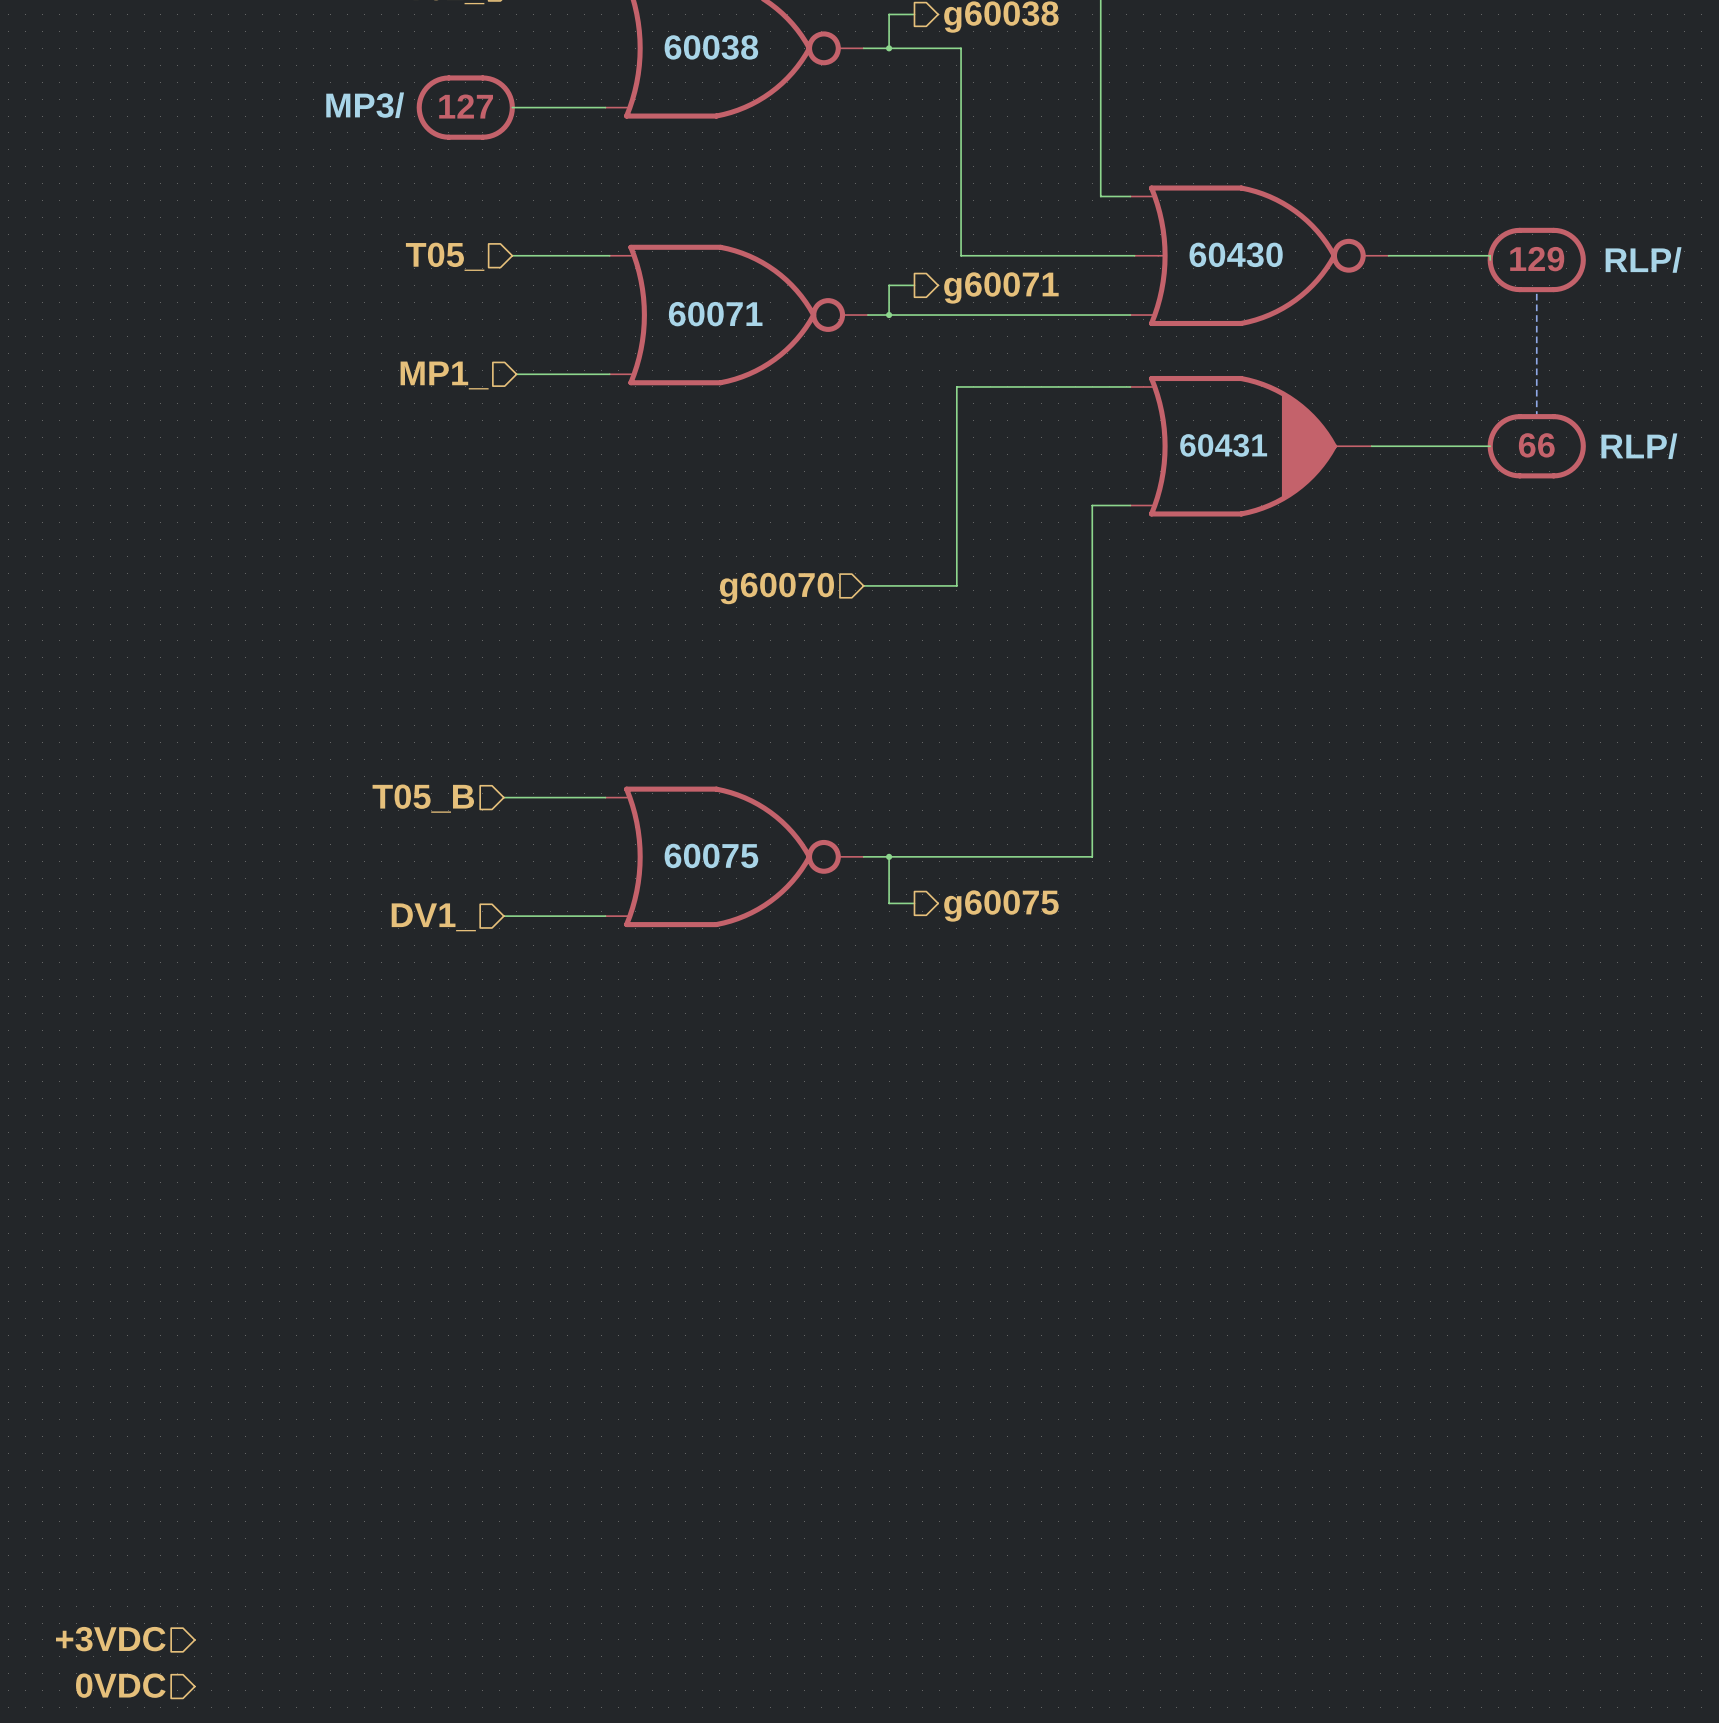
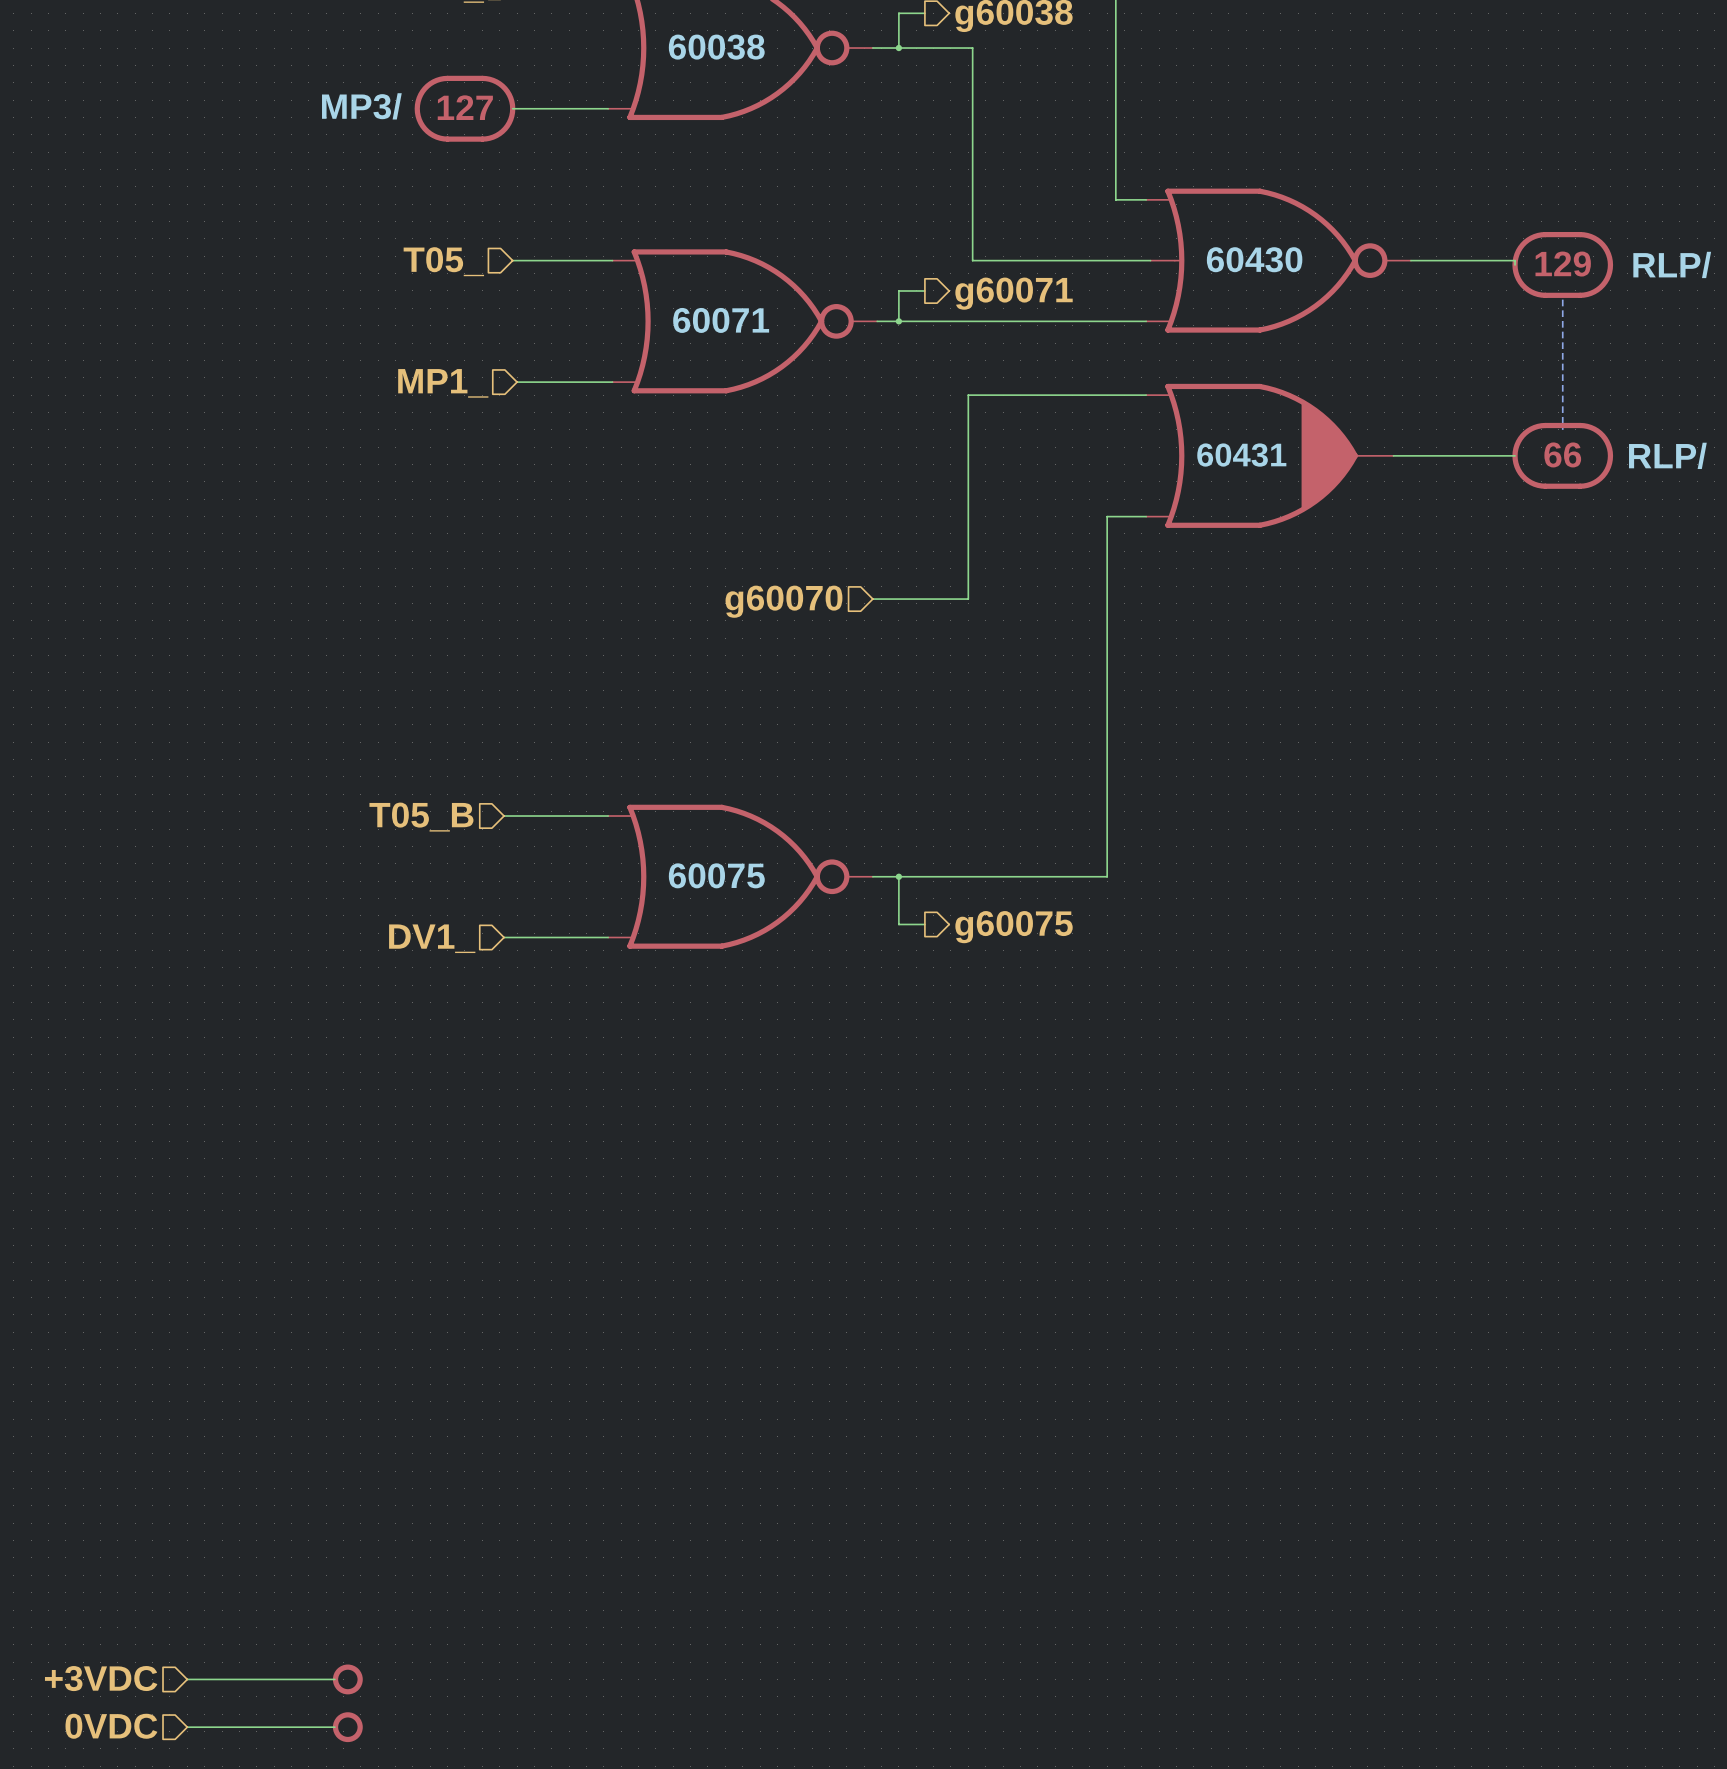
wire: none -> (187, 1679) (334, 1679)
part: none -> (347, 1679)
wire: none -> (187, 1727) (334, 1727)
part: none -> (347, 1727)

